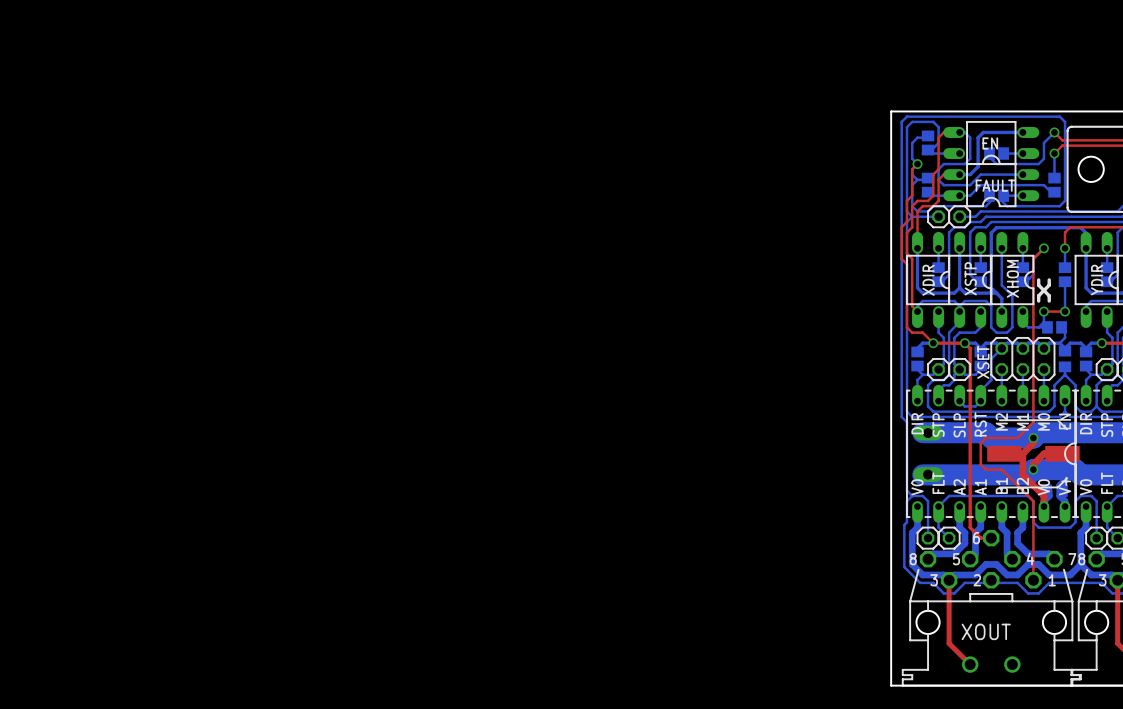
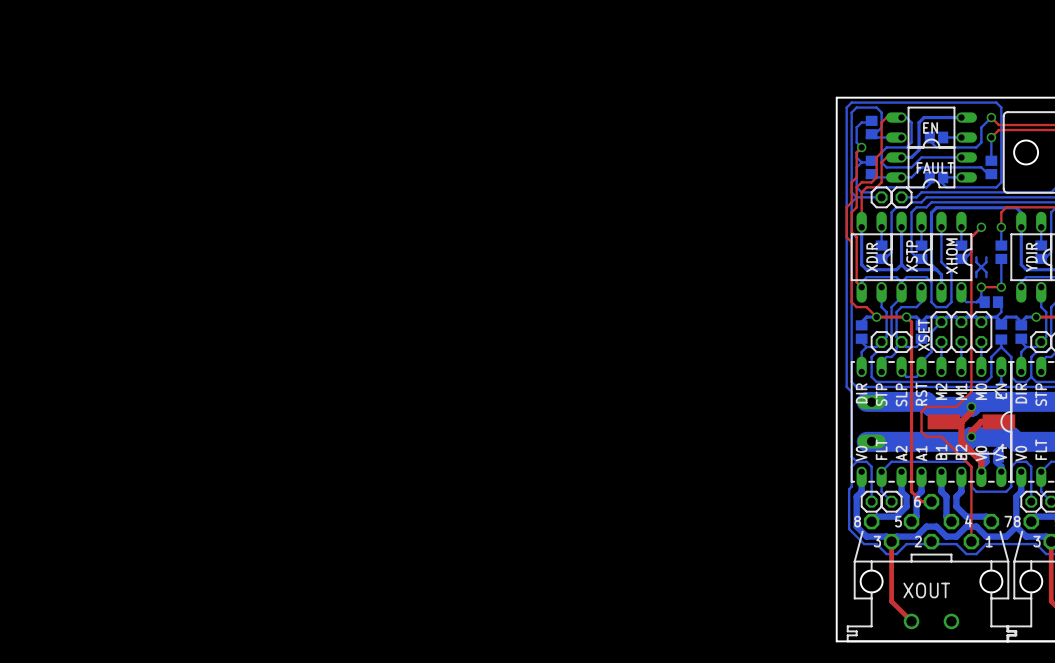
line: (1038, 279) (1038, 285) (1049, 295) (1049, 301) -> none
line: (1049, 279) (1049, 285) (1038, 295) (1038, 301) -> none

